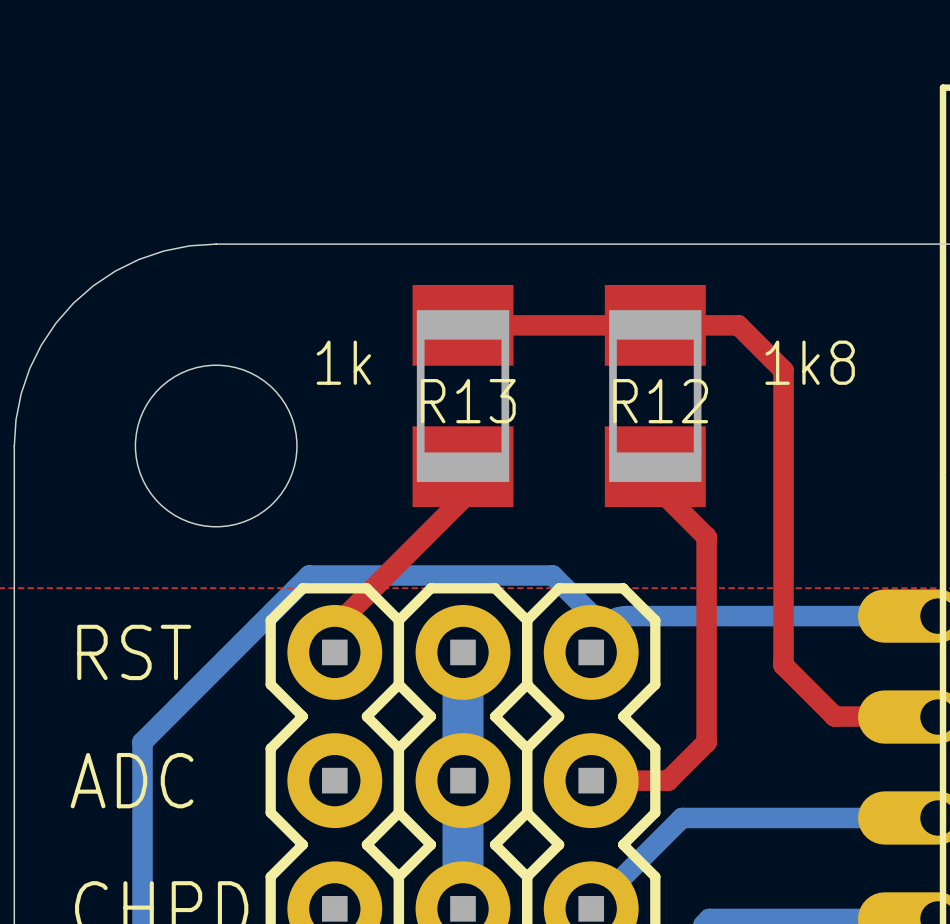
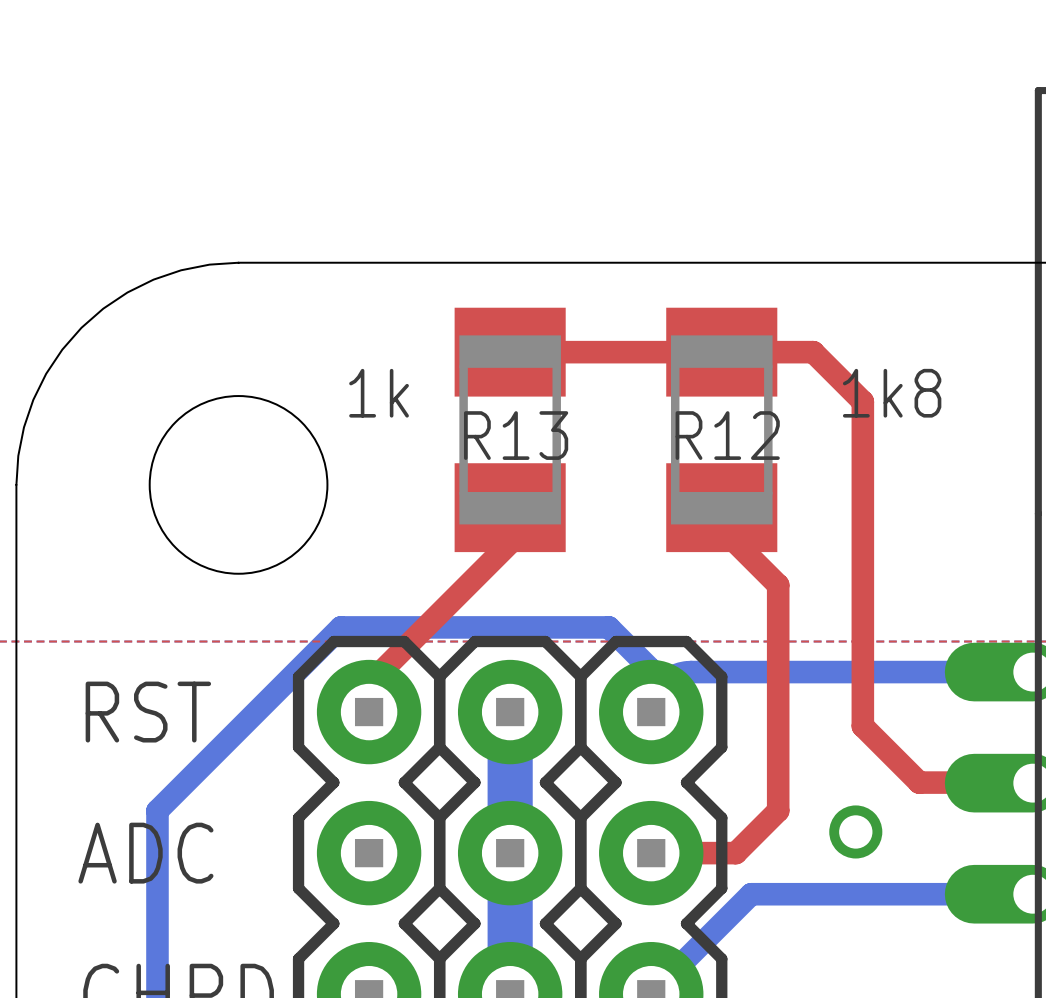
via: none -> (855, 831)

